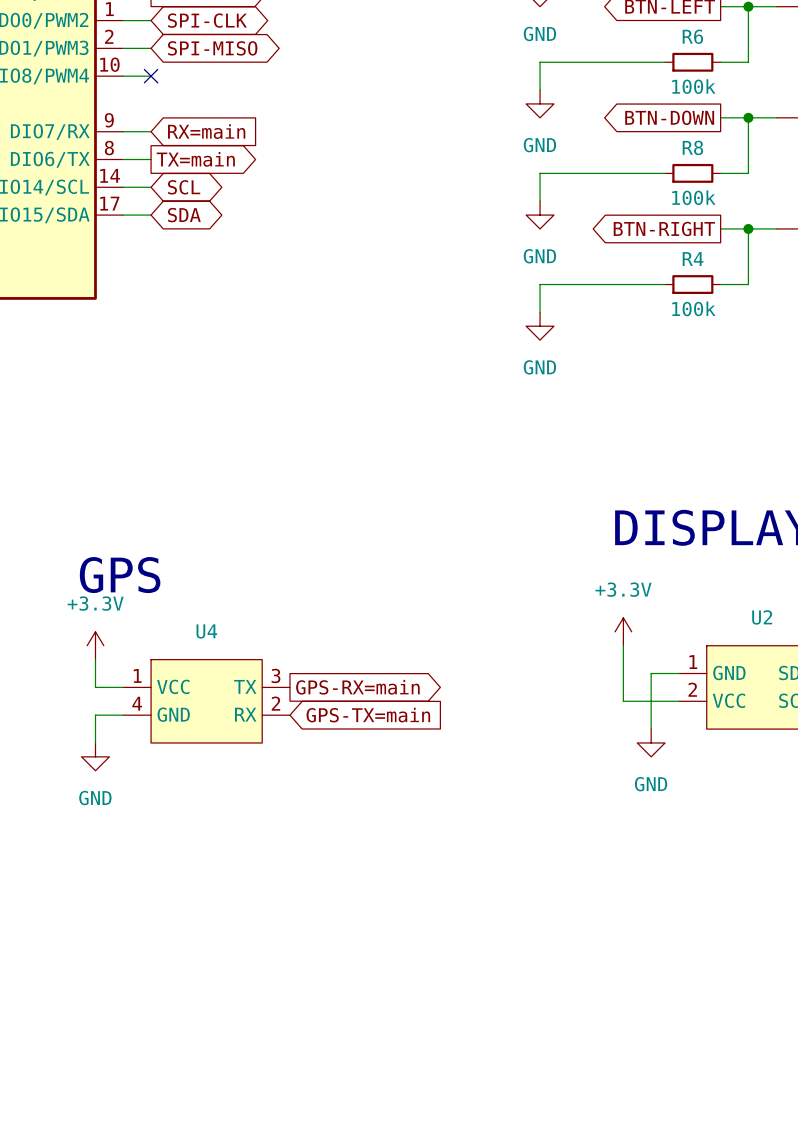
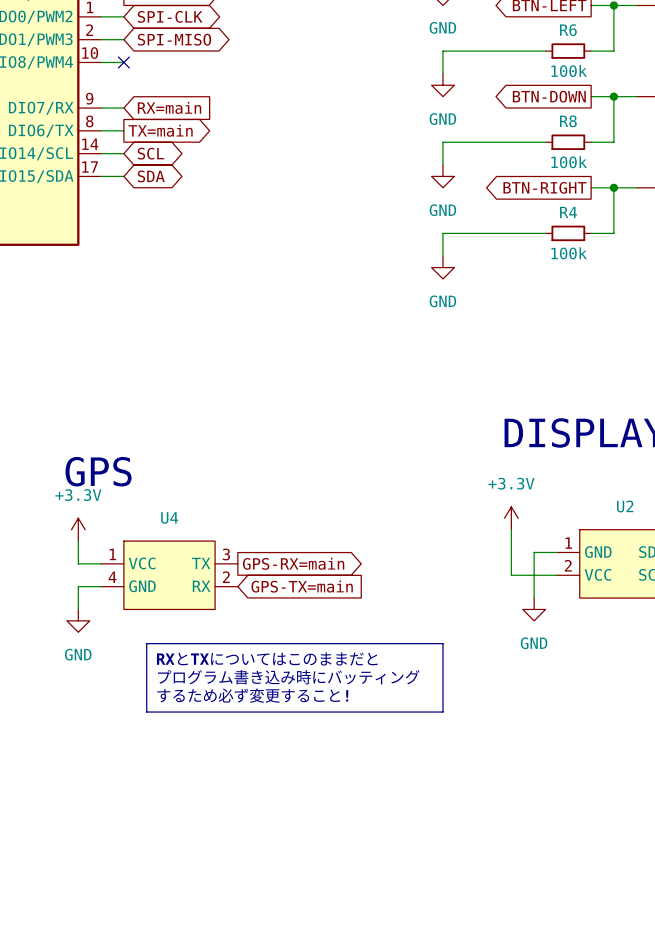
line: none -> (146, 643) (442, 643) (442, 712) (146, 712) (146, 643)
text: none -> RXとTXについてはこのままだと (267, 659)
text: none -> プログラム書き込み時にバッティング (288, 677)
text: none -> するため必ず変更すること! (252, 695)

